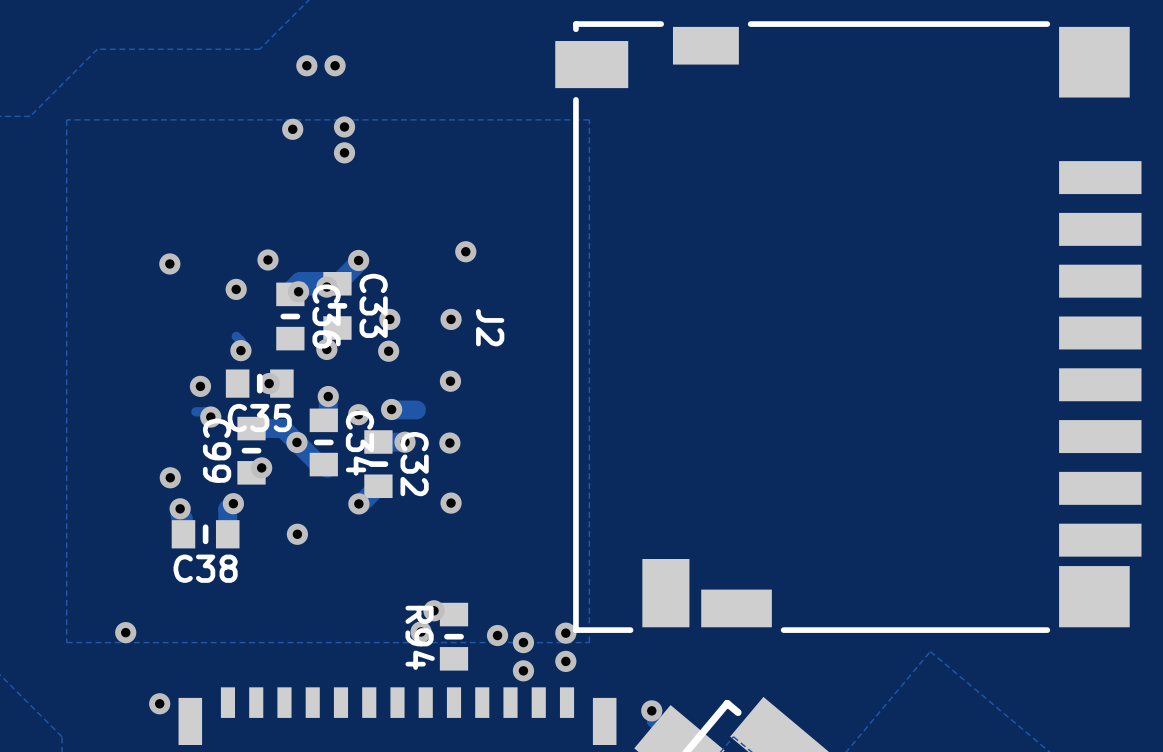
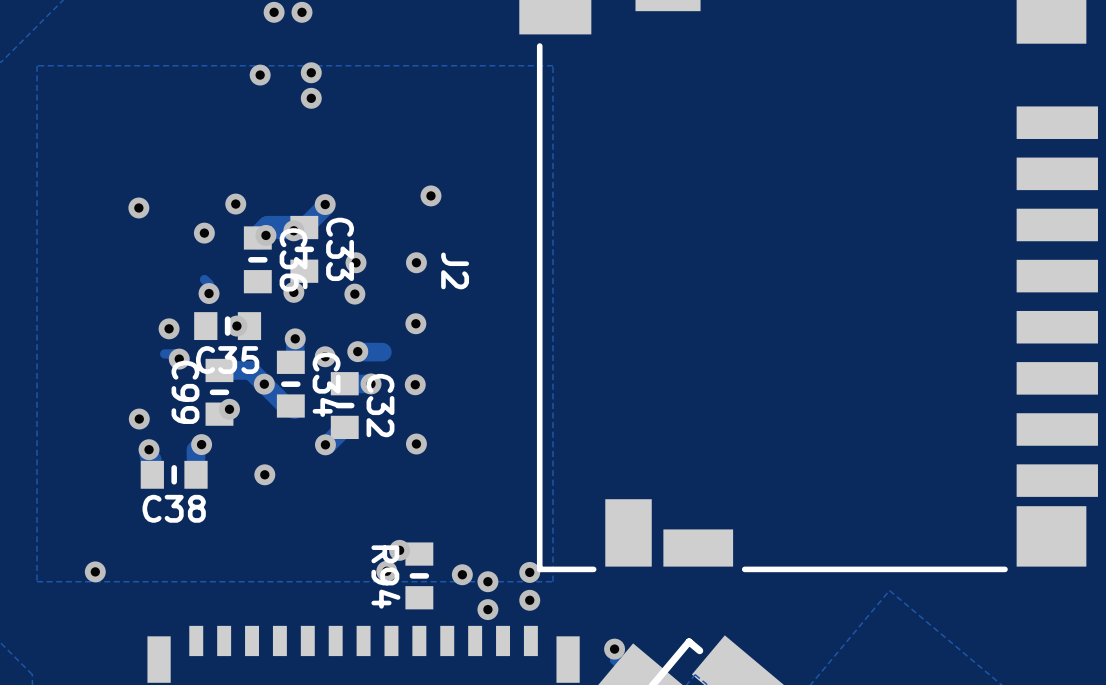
via: (159, 703) -> none

